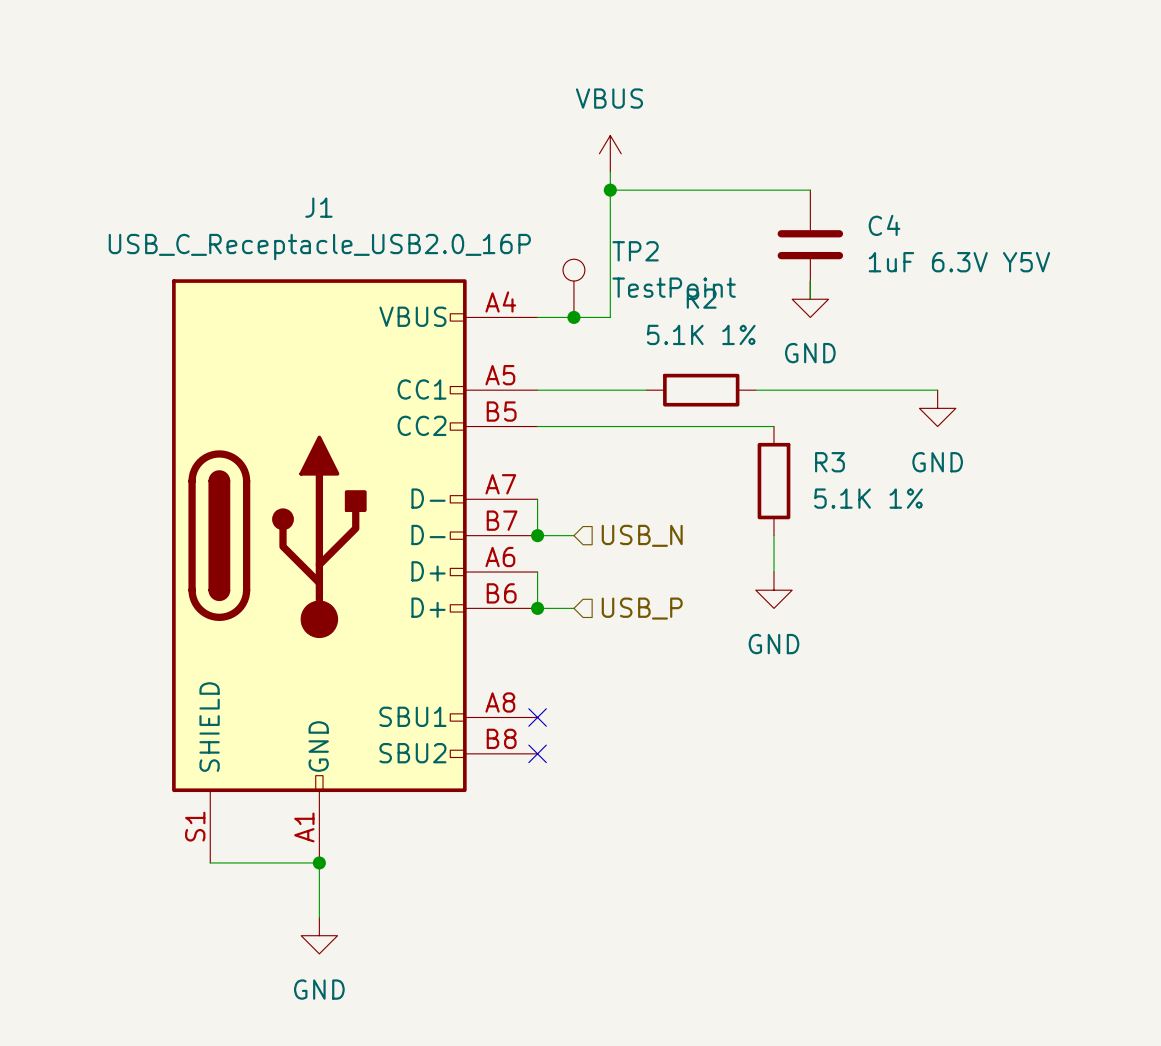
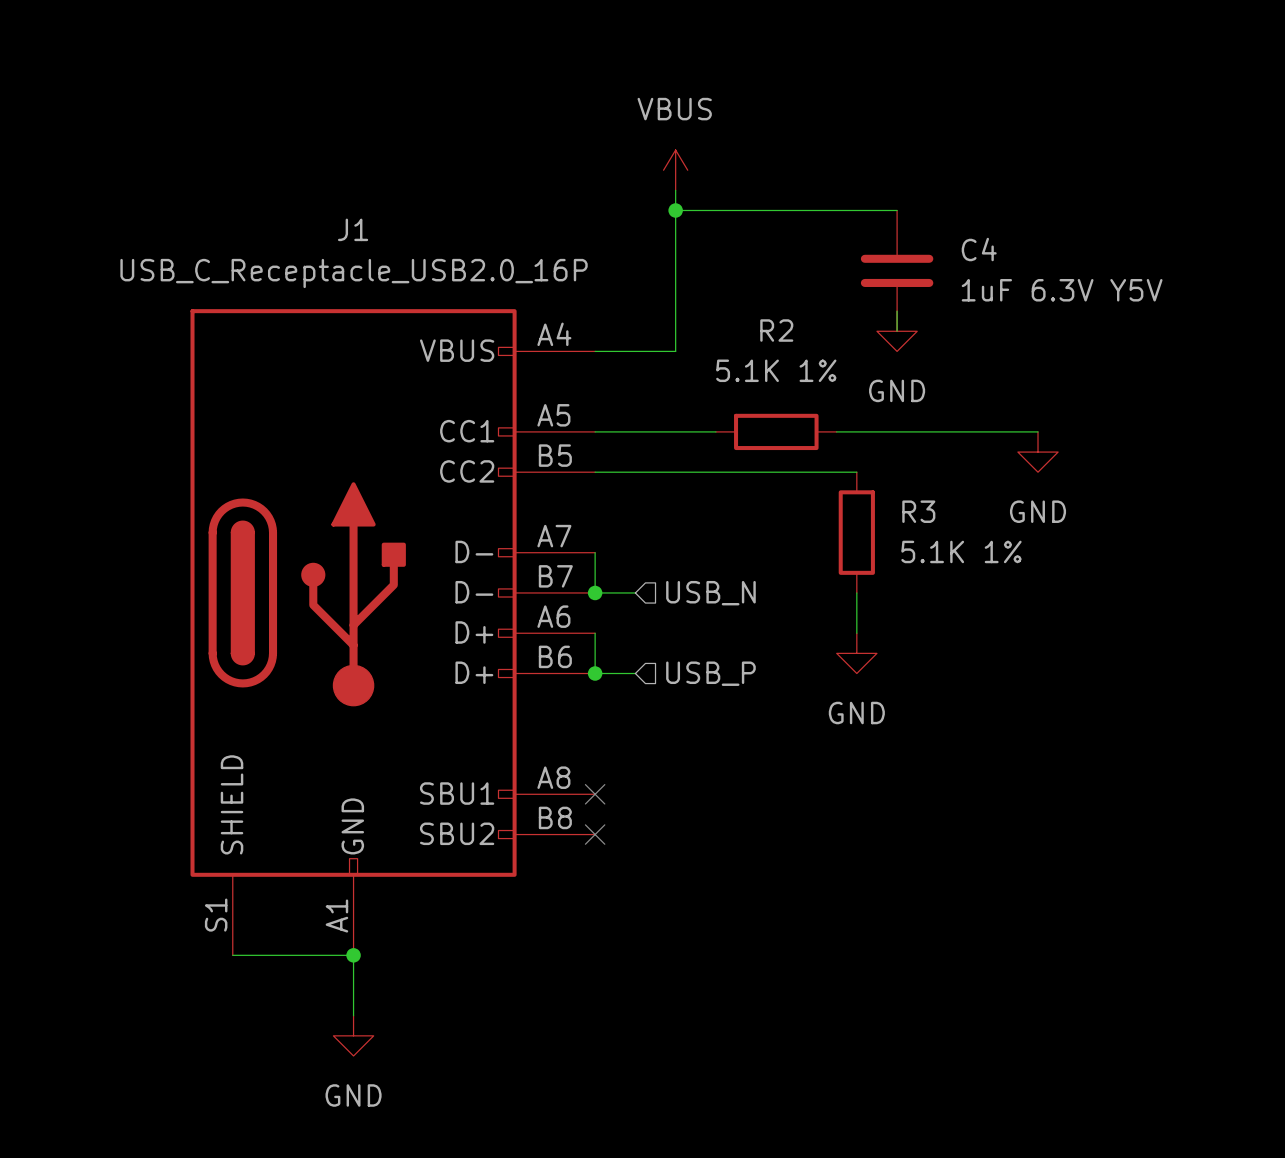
TP2: TestPoint (573, 288) -> none
junction: (573, 317) -> none

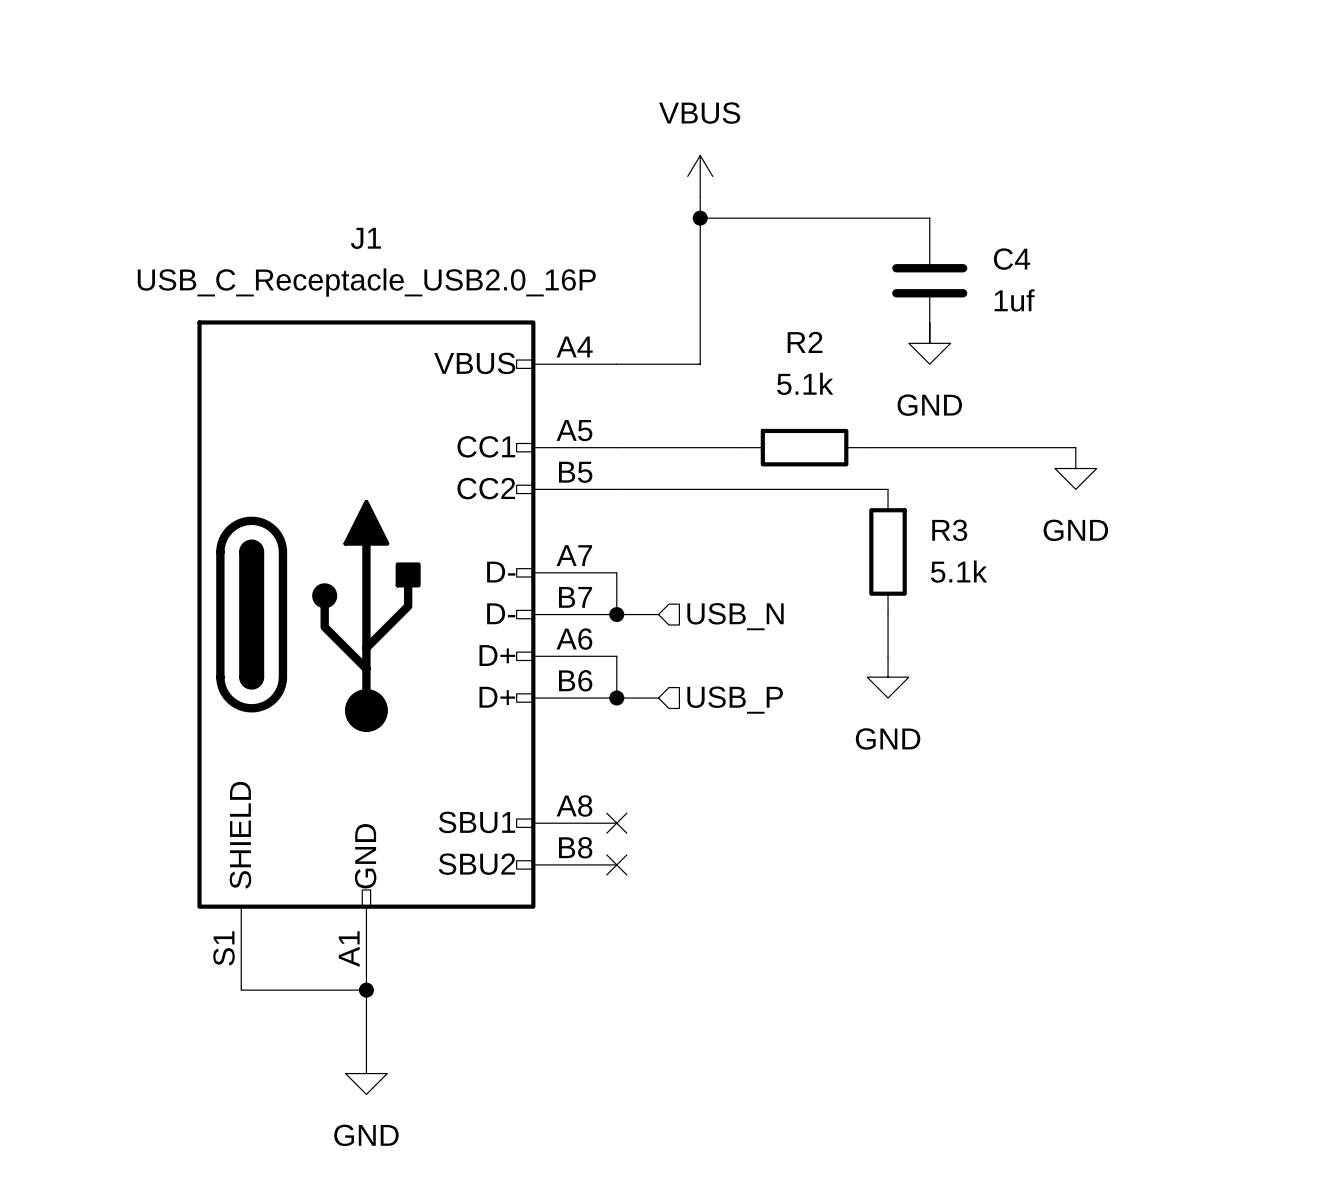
C4 value: 1uF 6.3V Y5V (1062, 290) -> 1uf (1014, 300)
R2 value: 5.1K 1% (776, 370) -> 5.1k (805, 383)
R3 value: 5.1K 1% (961, 551) -> 5.1k (959, 571)

